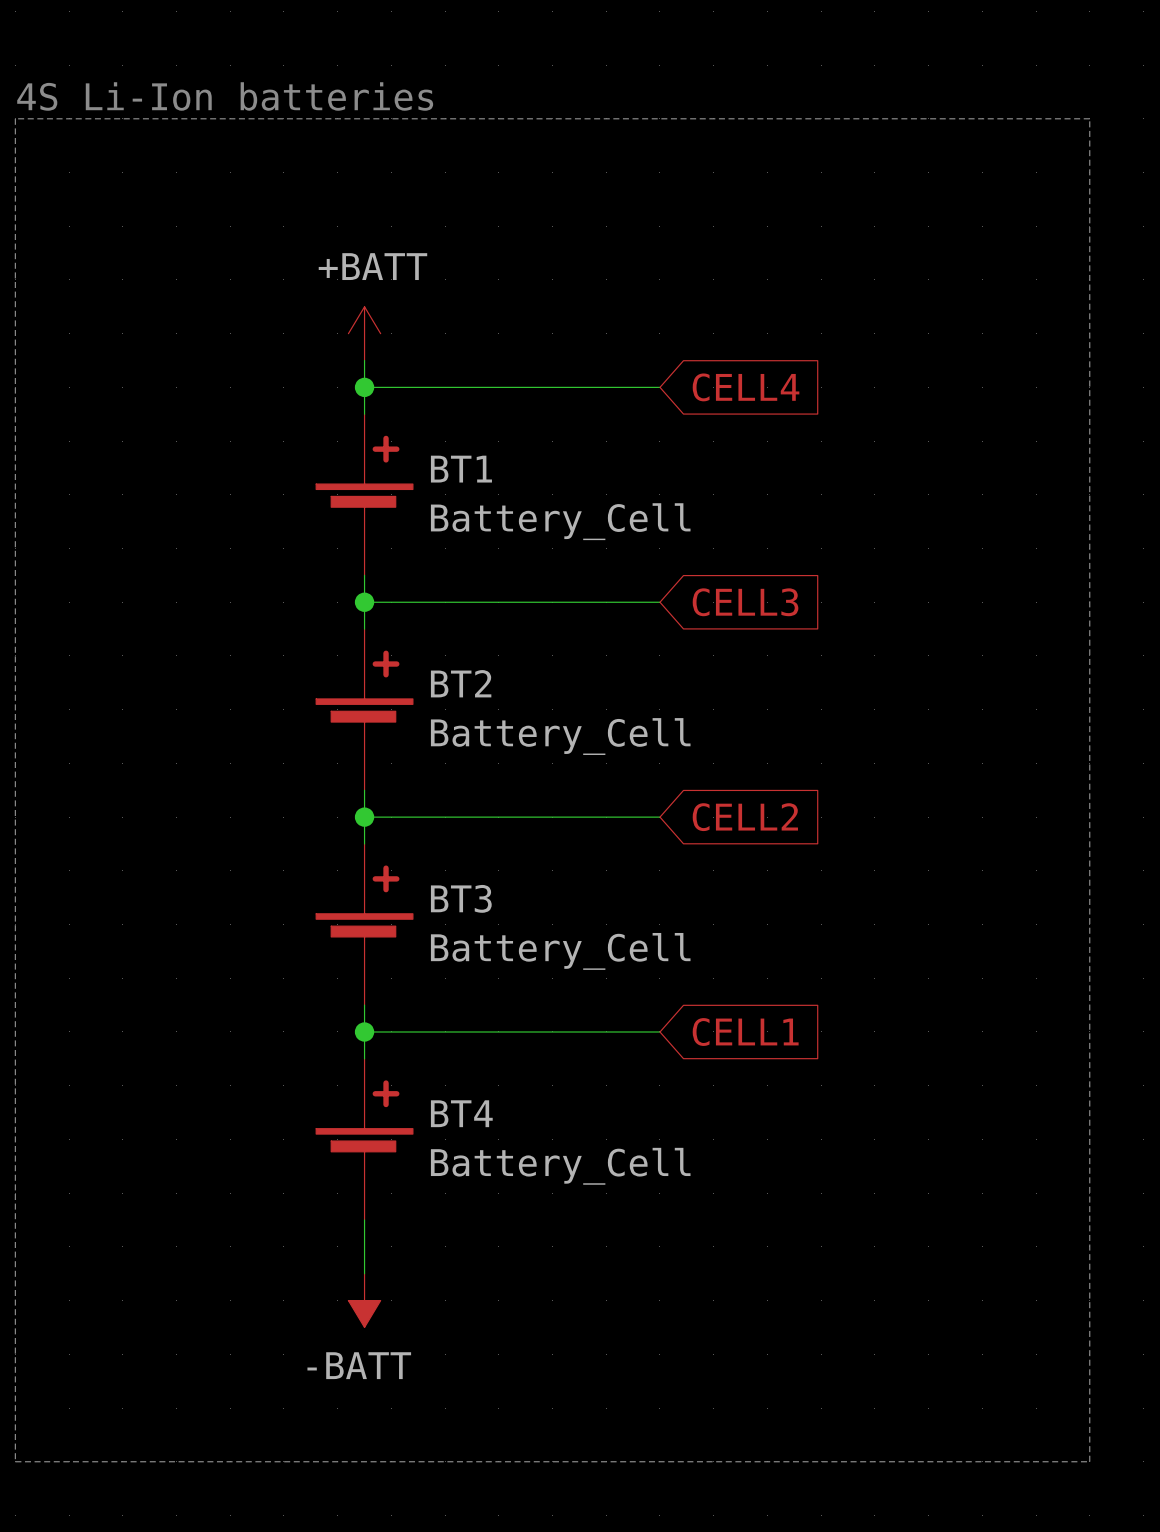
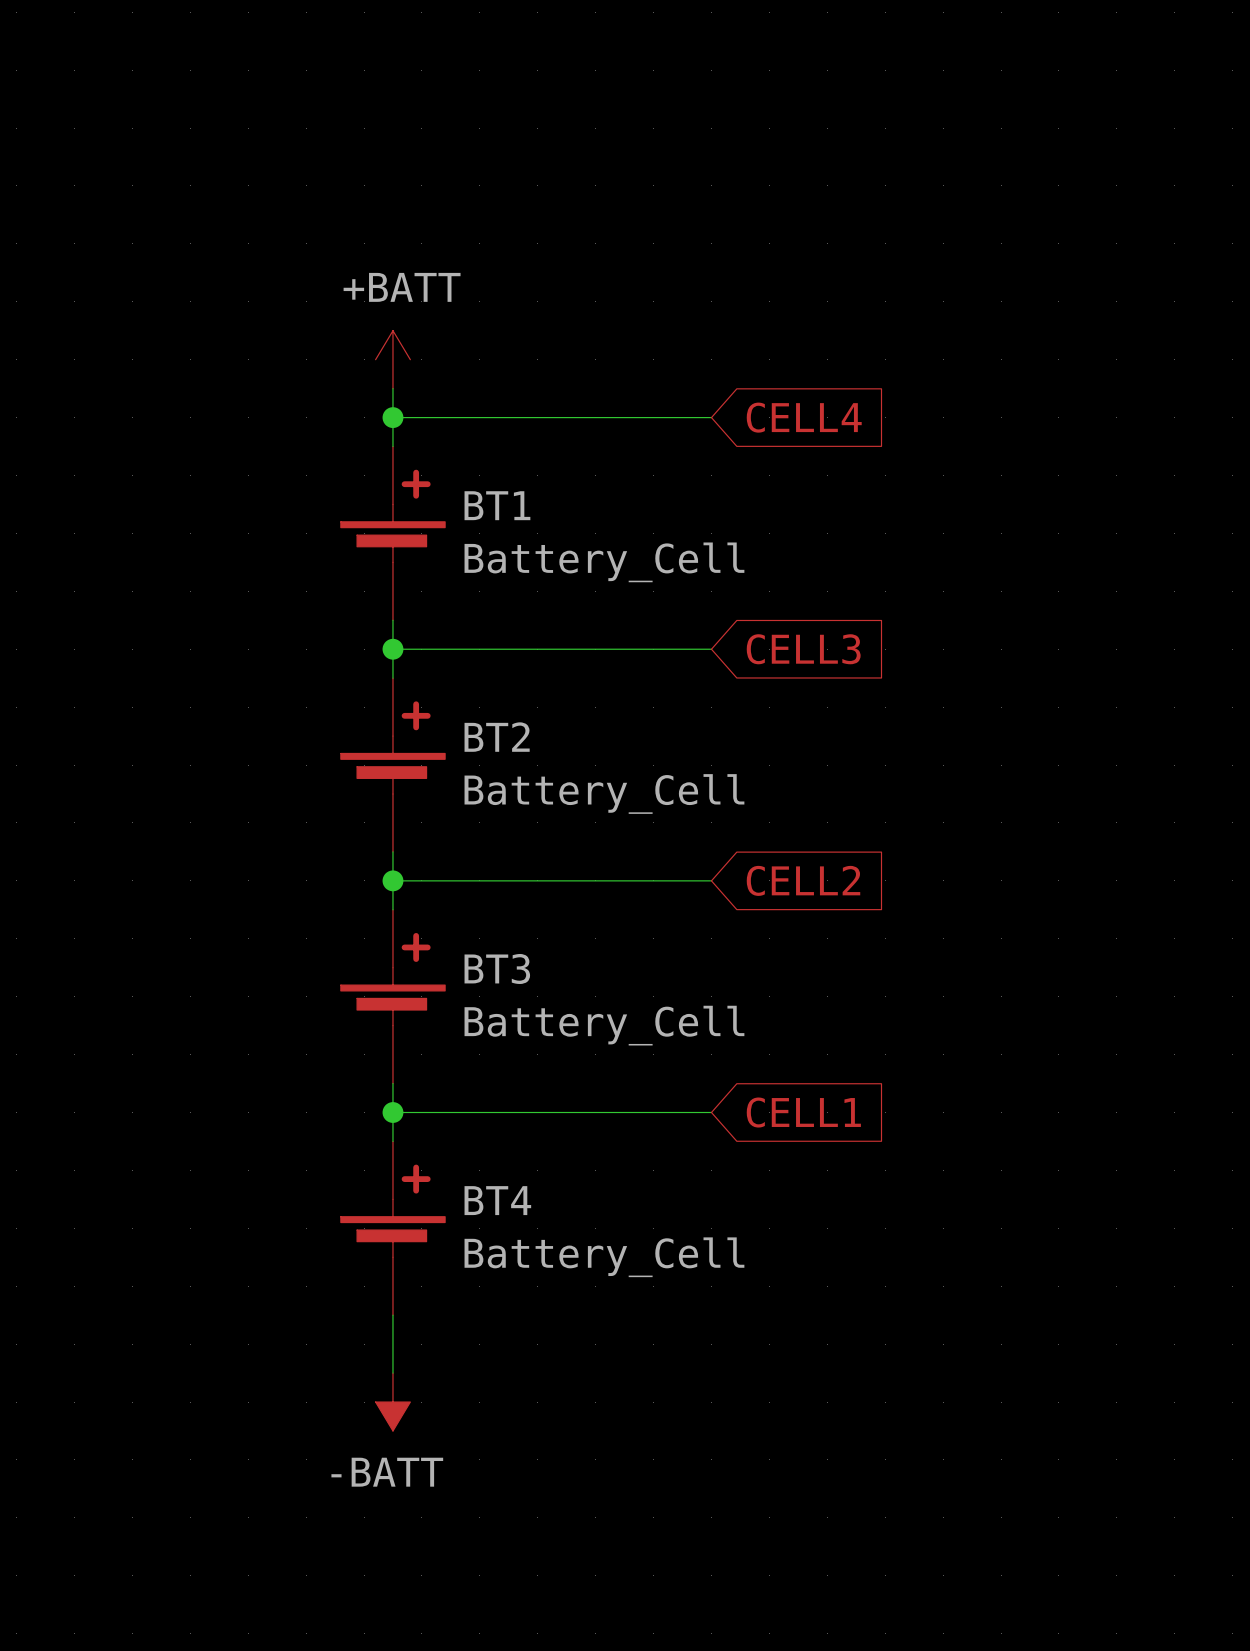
text: 4S Li-Ion batteries (225, 96) -> none
line: (15, 118) (1089, 118) (1089, 1461) (15, 1461) (15, 118) -> none

